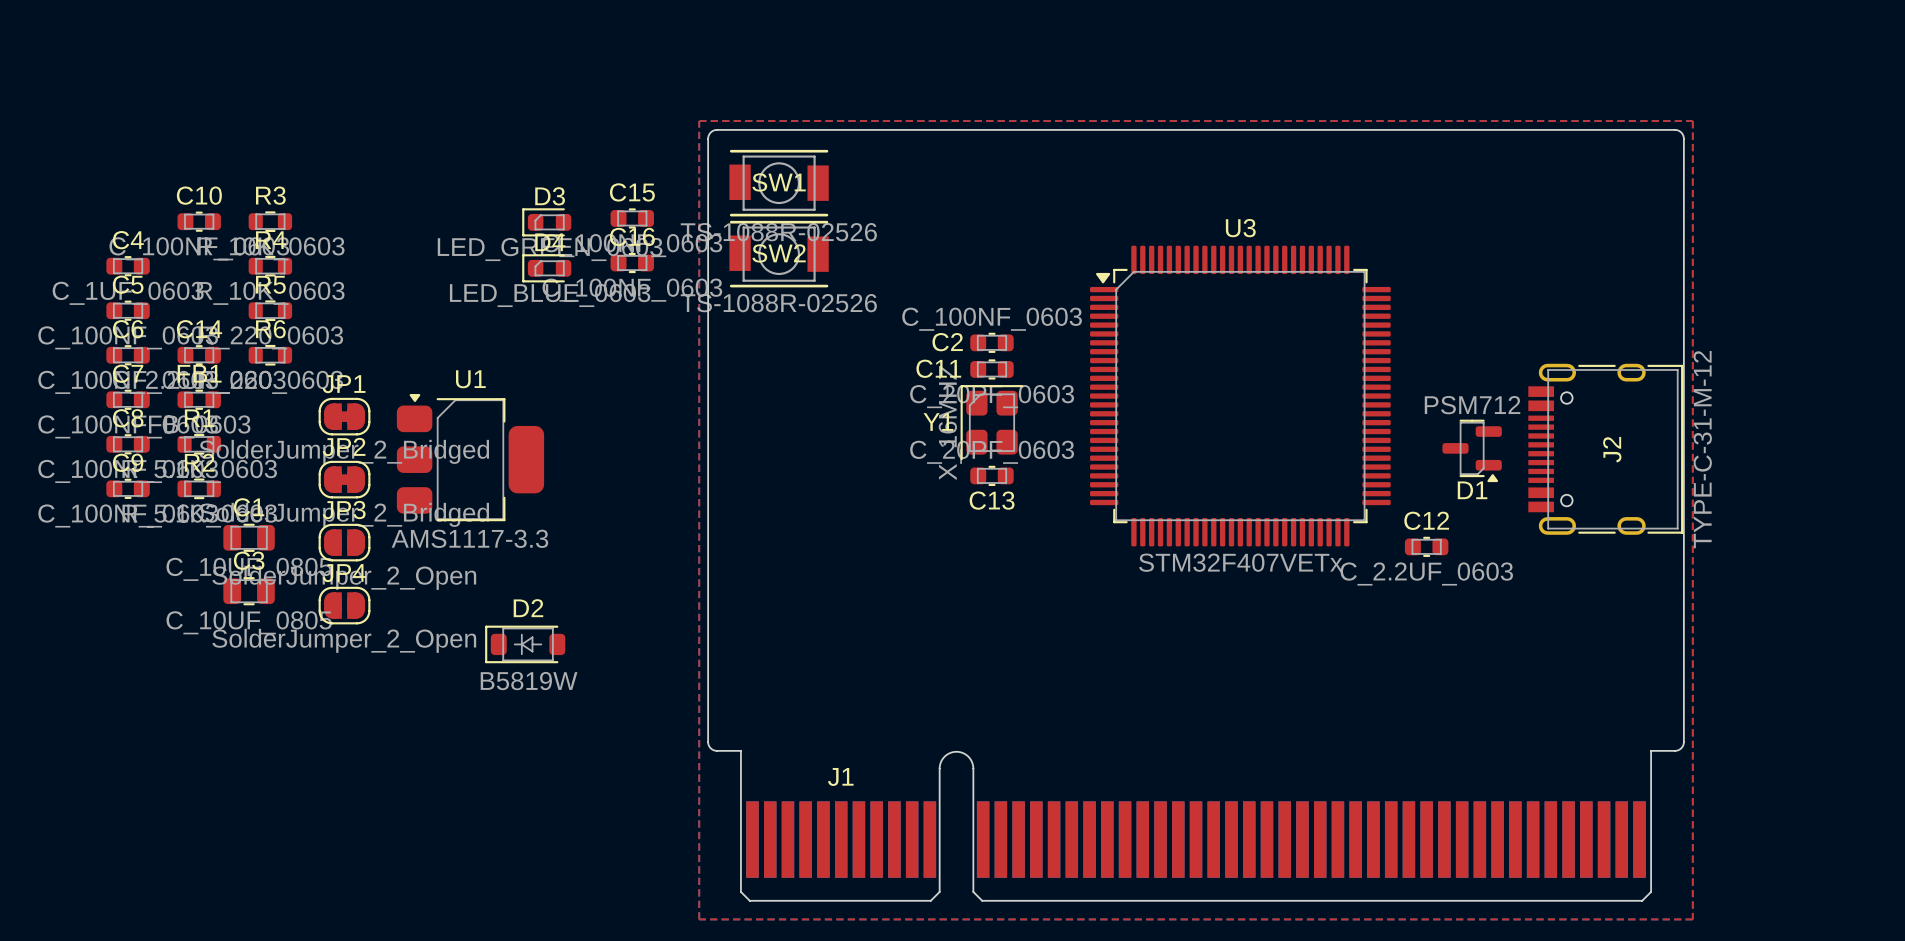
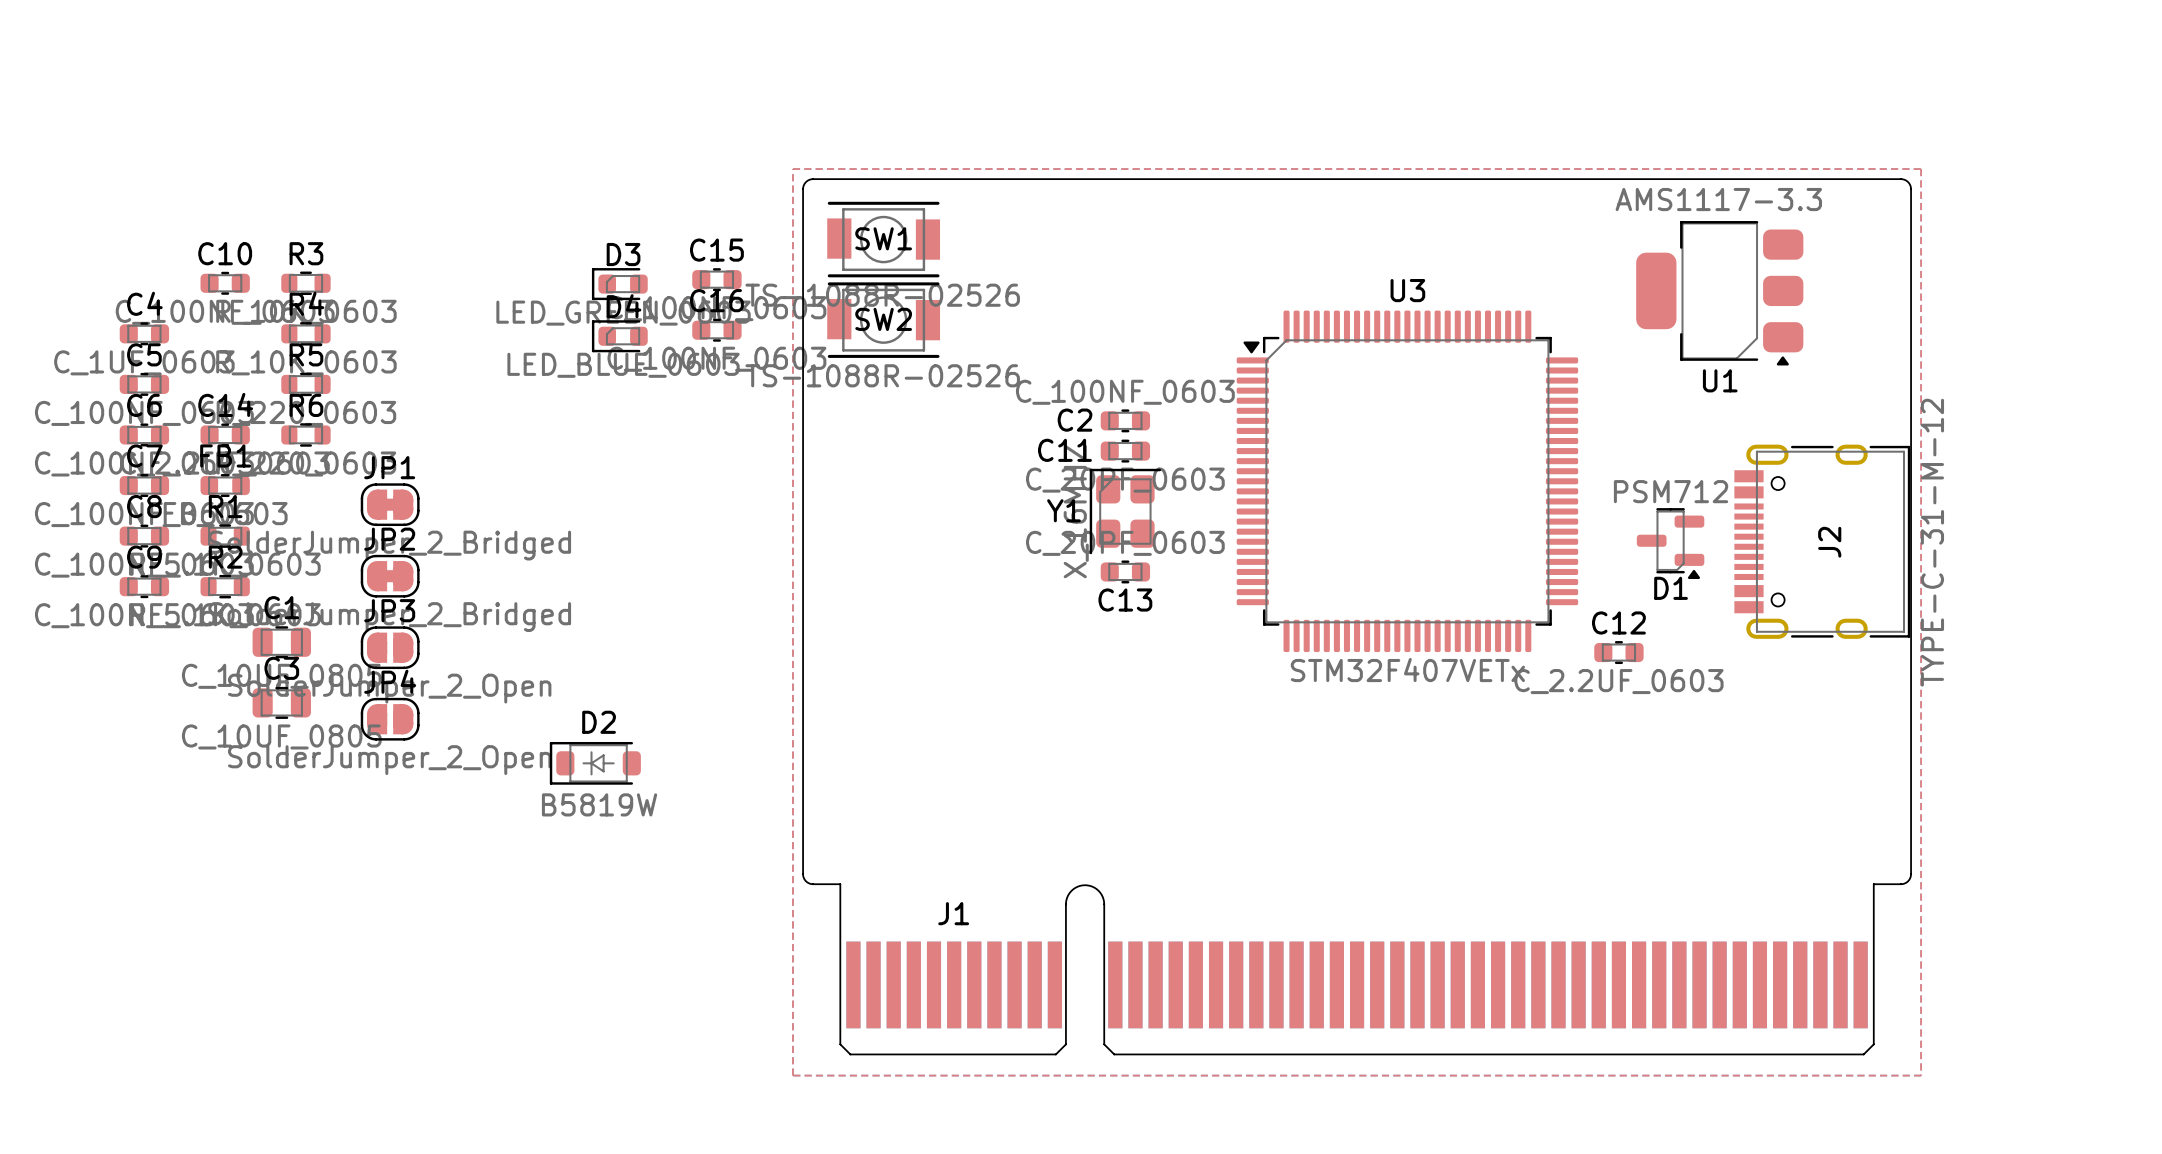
U1 rotation: 0° (470, 457) -> 180° (1719, 293)
U1 position: (470, 457) -> (1719, 293)

